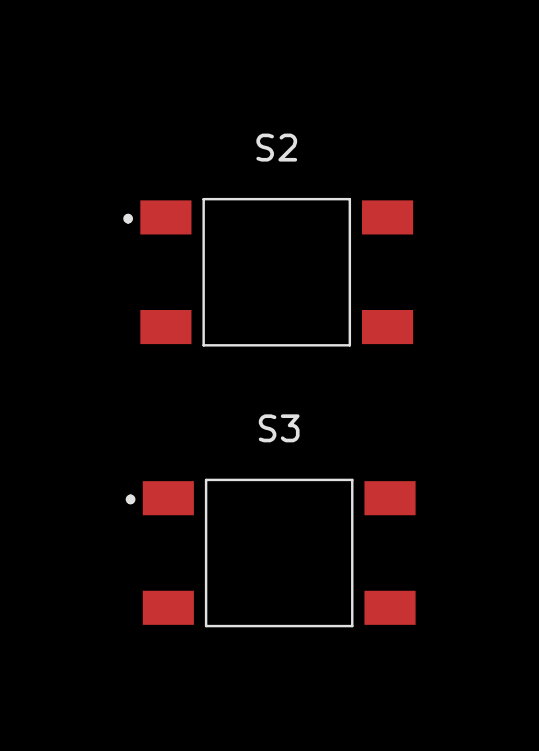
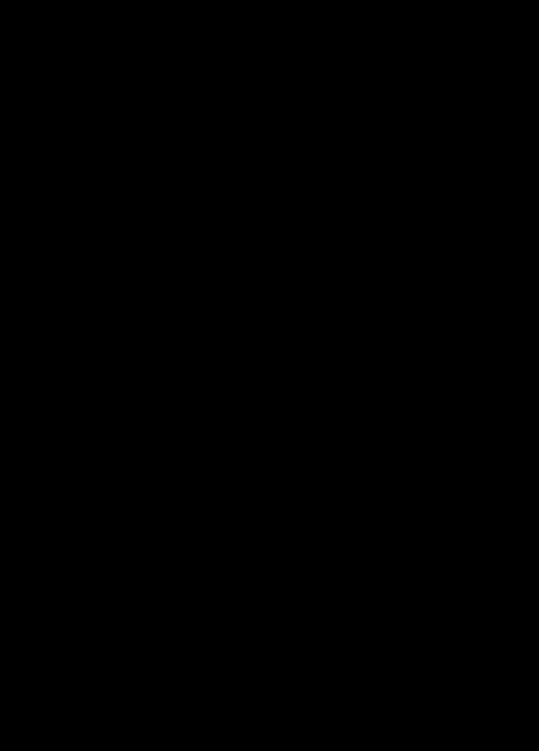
S2: (268, 272) -> none
S3: (270, 553) -> none

